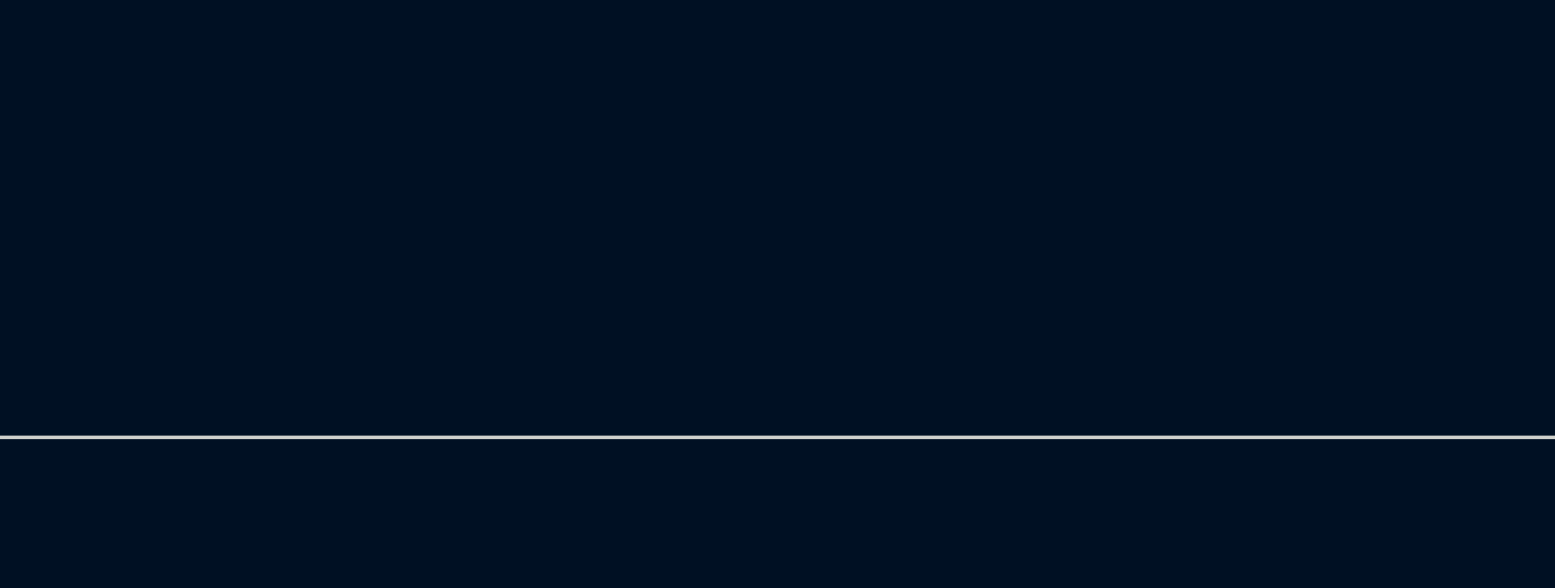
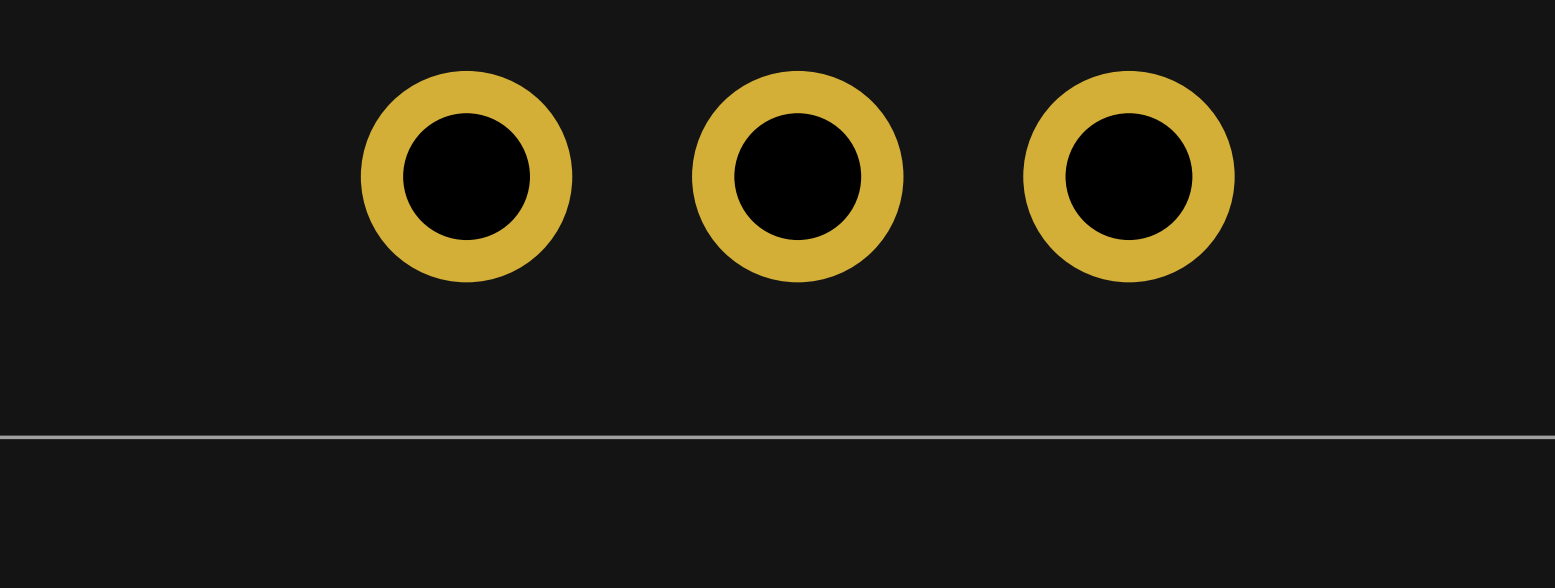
part: none -> (797, 176)

